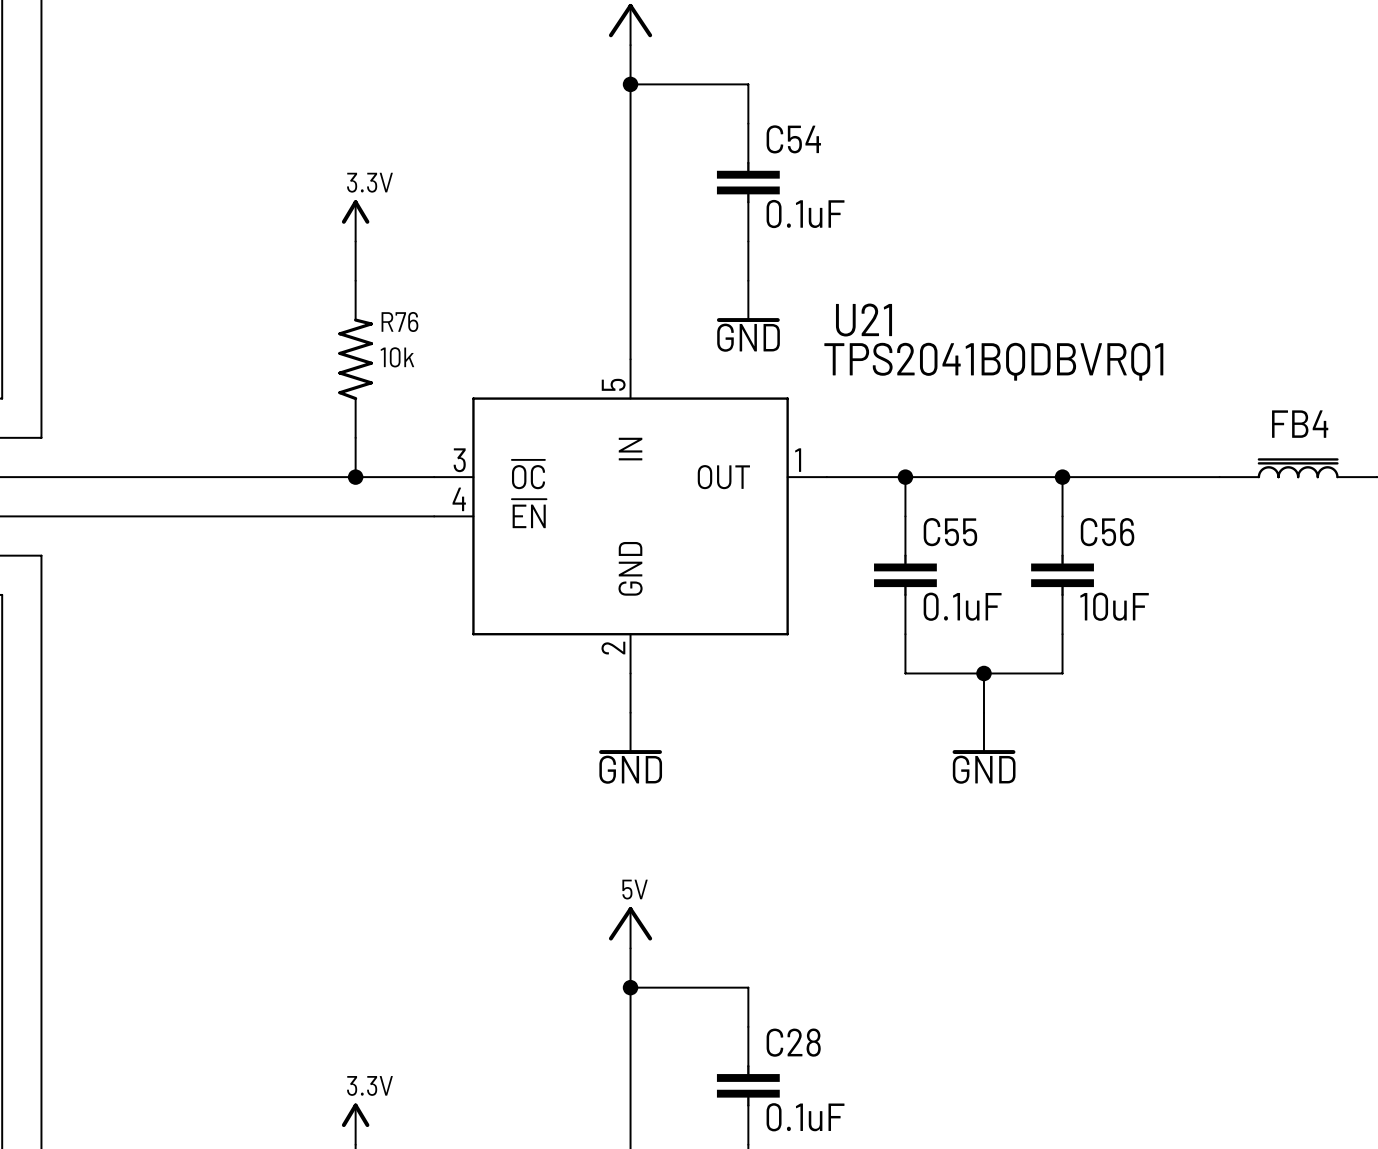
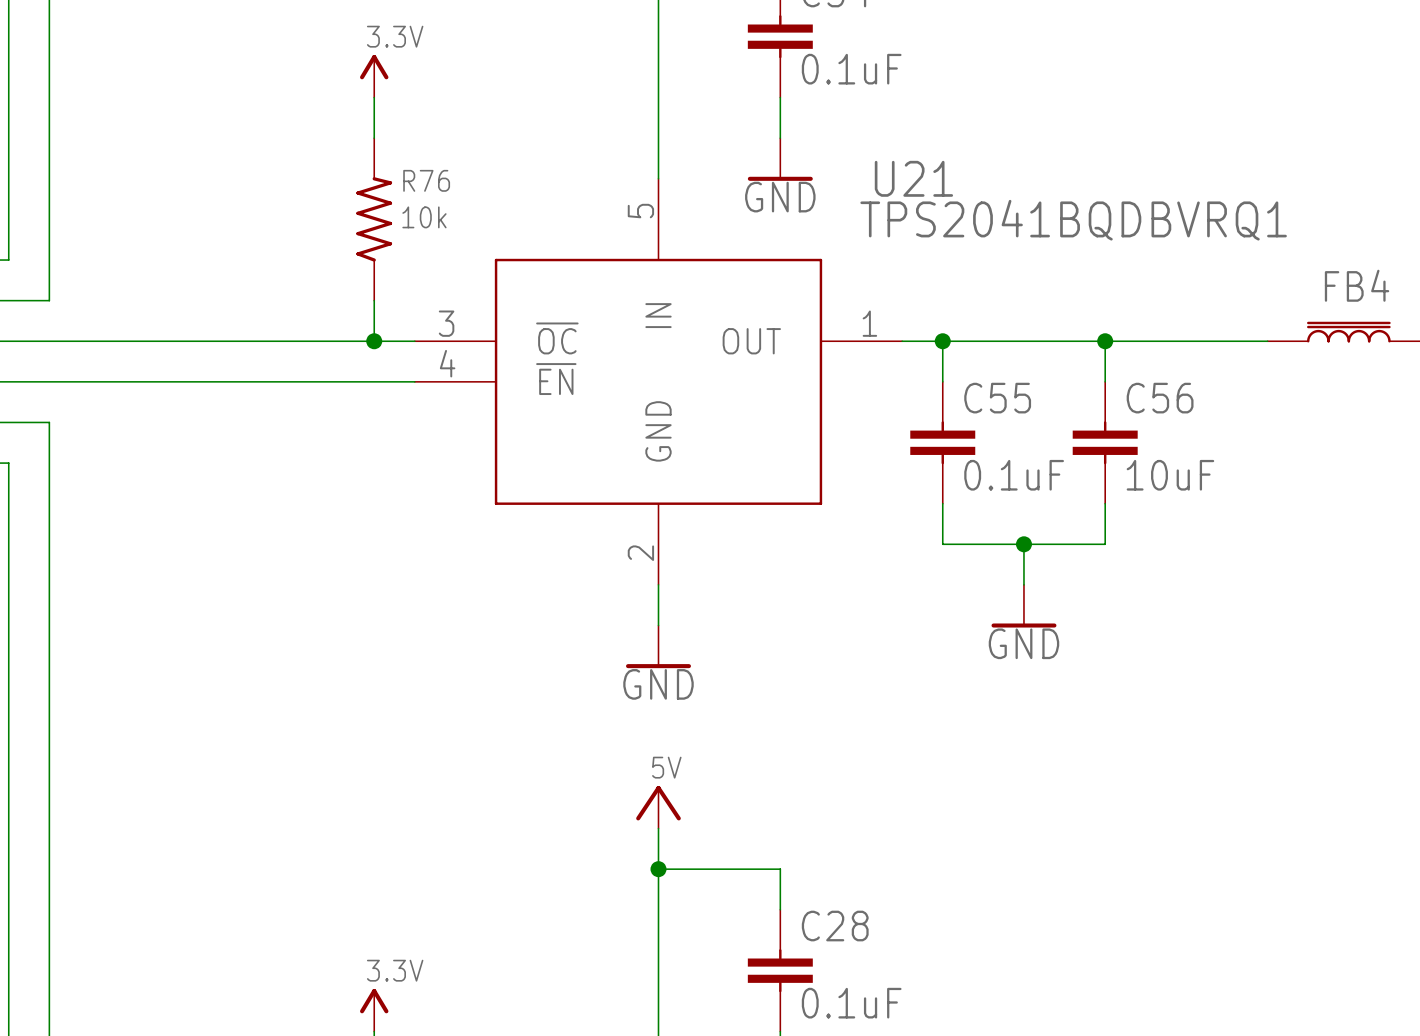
U21 symbol: [434, 359, 827, 674] -> [414, 178, 903, 585]
power symbol position: GND (630, 733) -> GND (658, 646)

